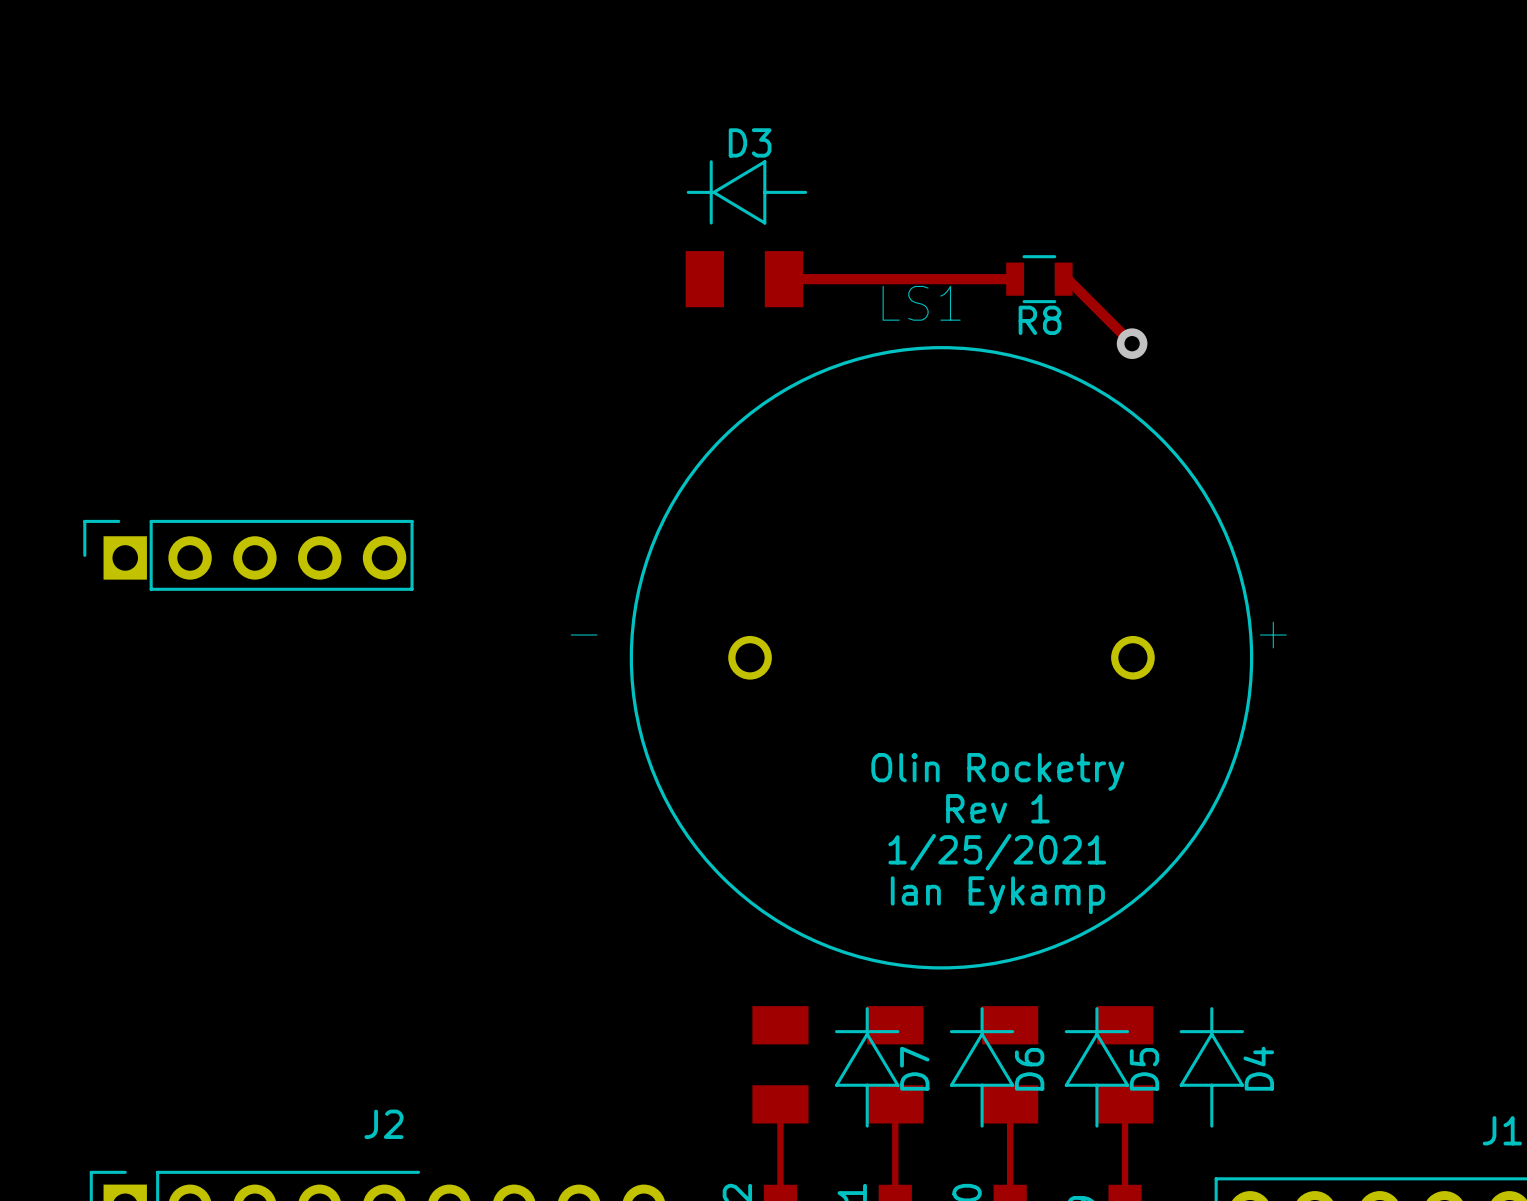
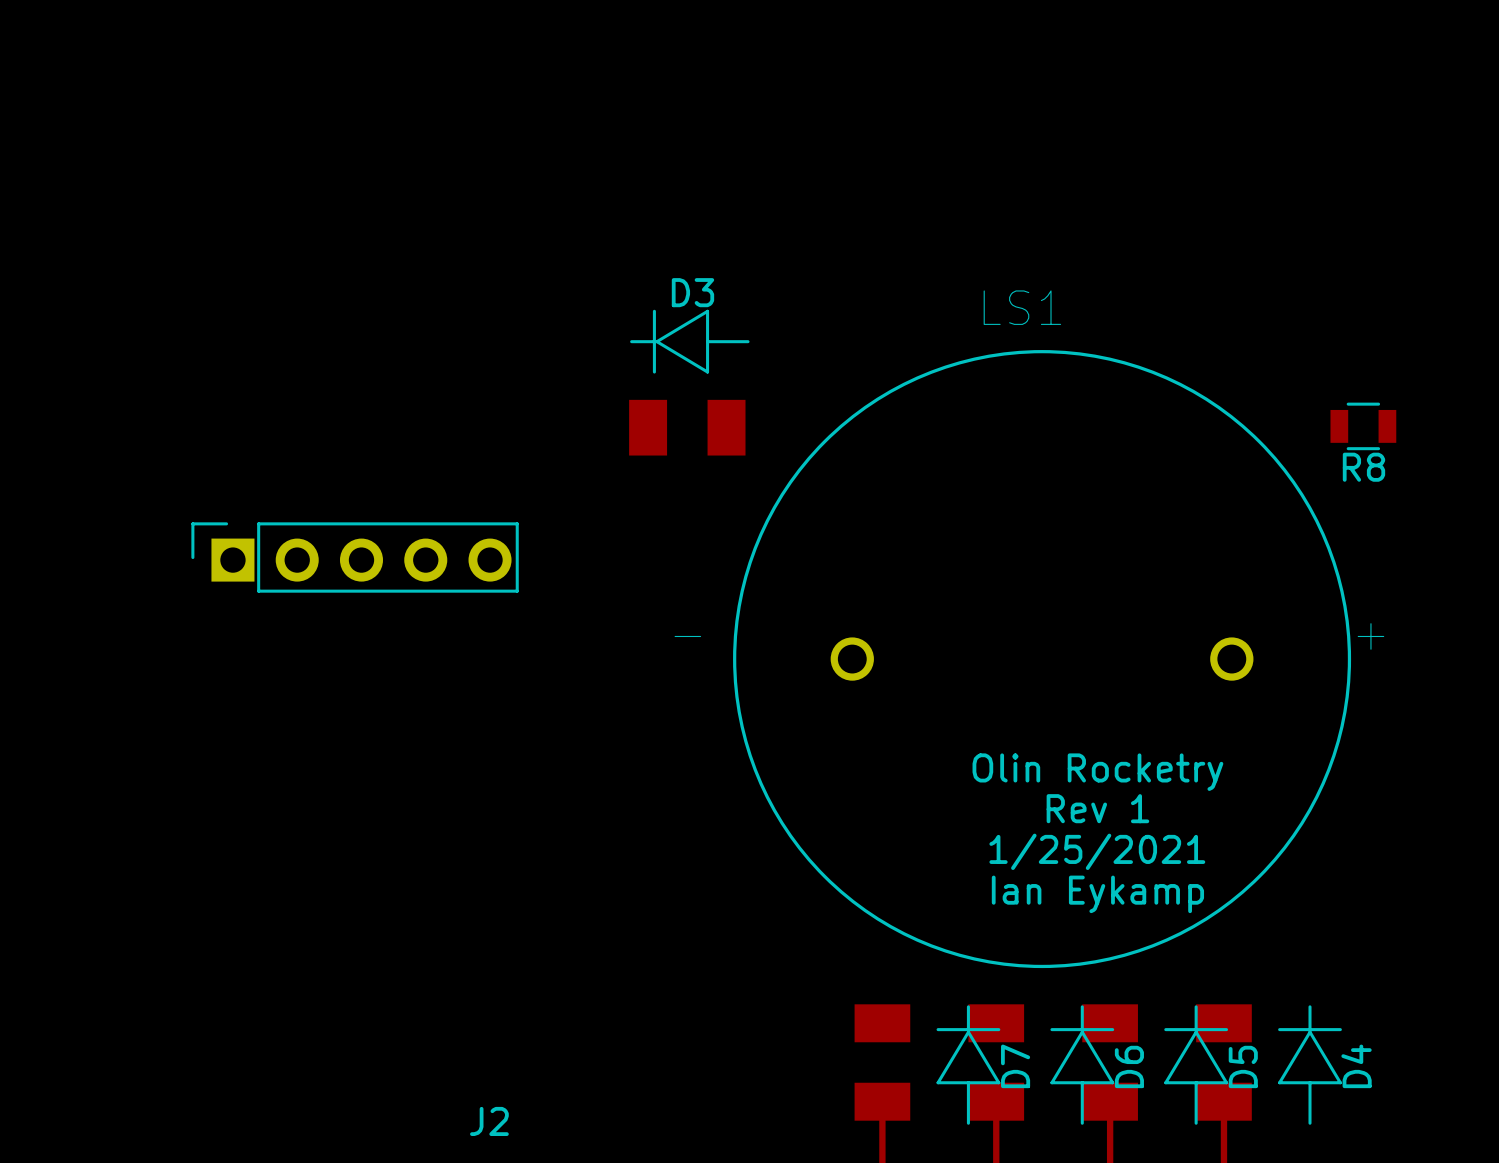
D3 position: (746, 233) -> (689, 382)
track: (783, 279) (1015, 279) -> none
R8 position: (1039, 279) -> (1363, 426)
track: (1063, 279) (1067, 279) (1132, 343) -> none
via: (1132, 343) -> none

